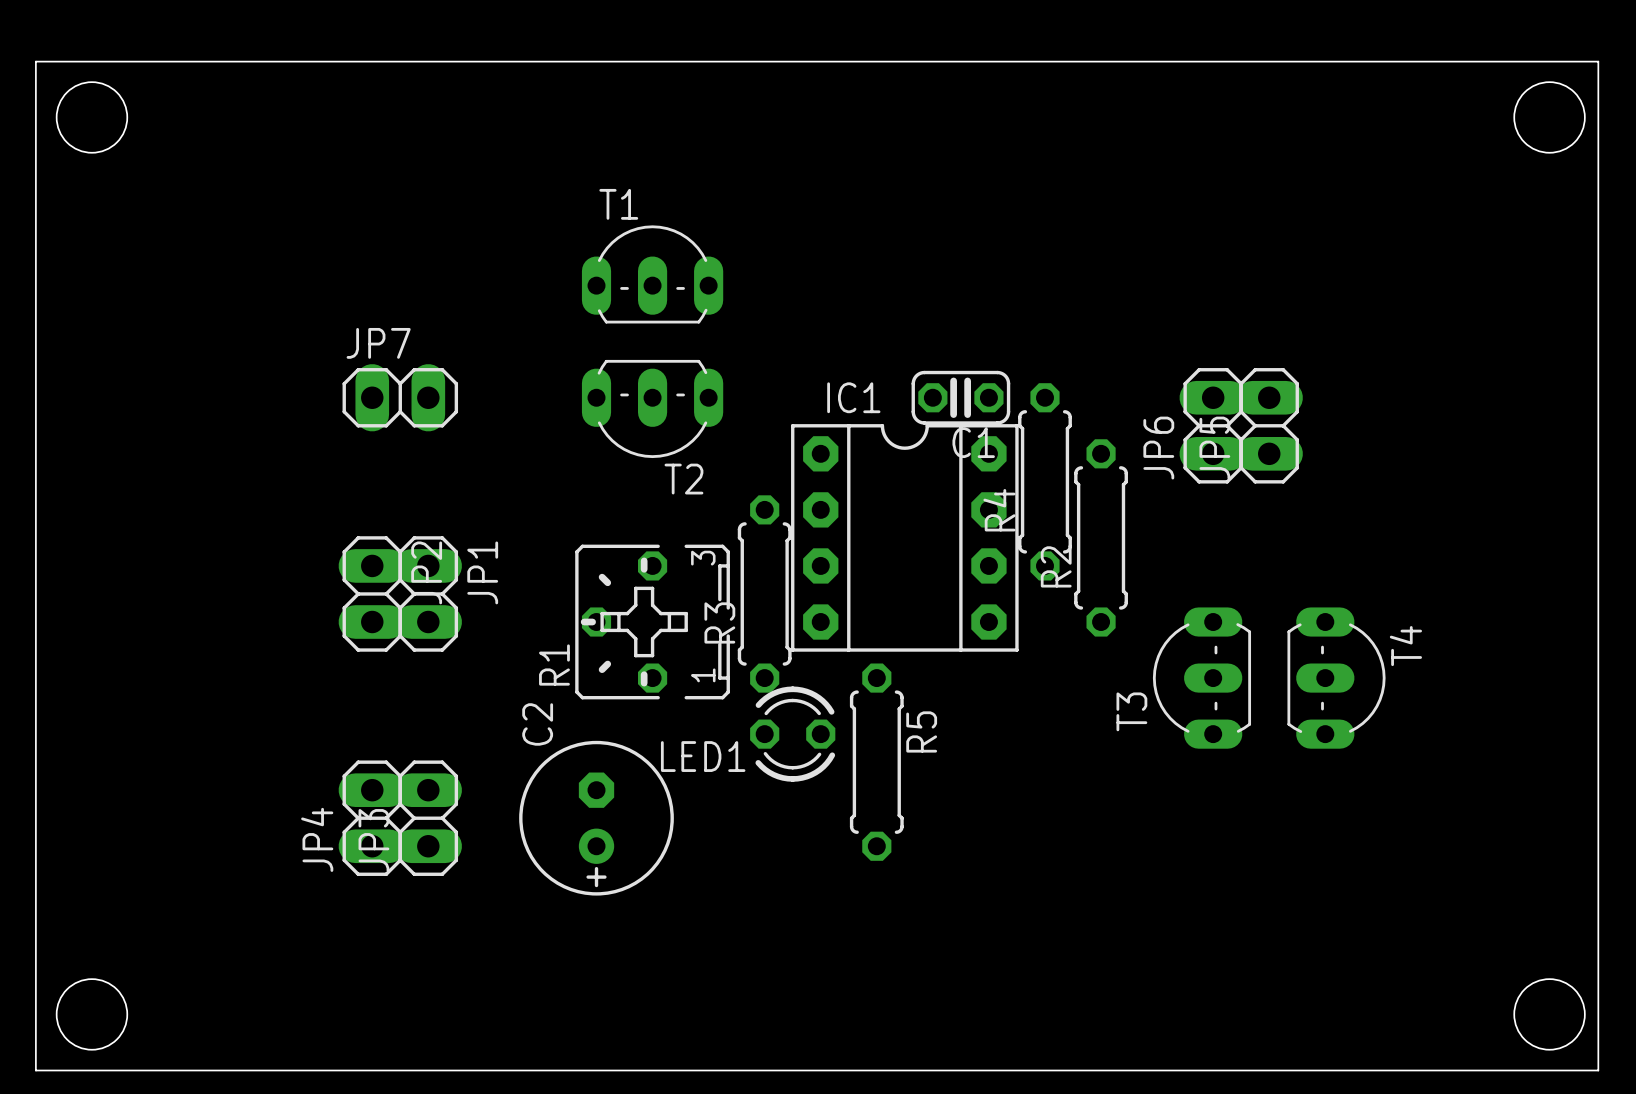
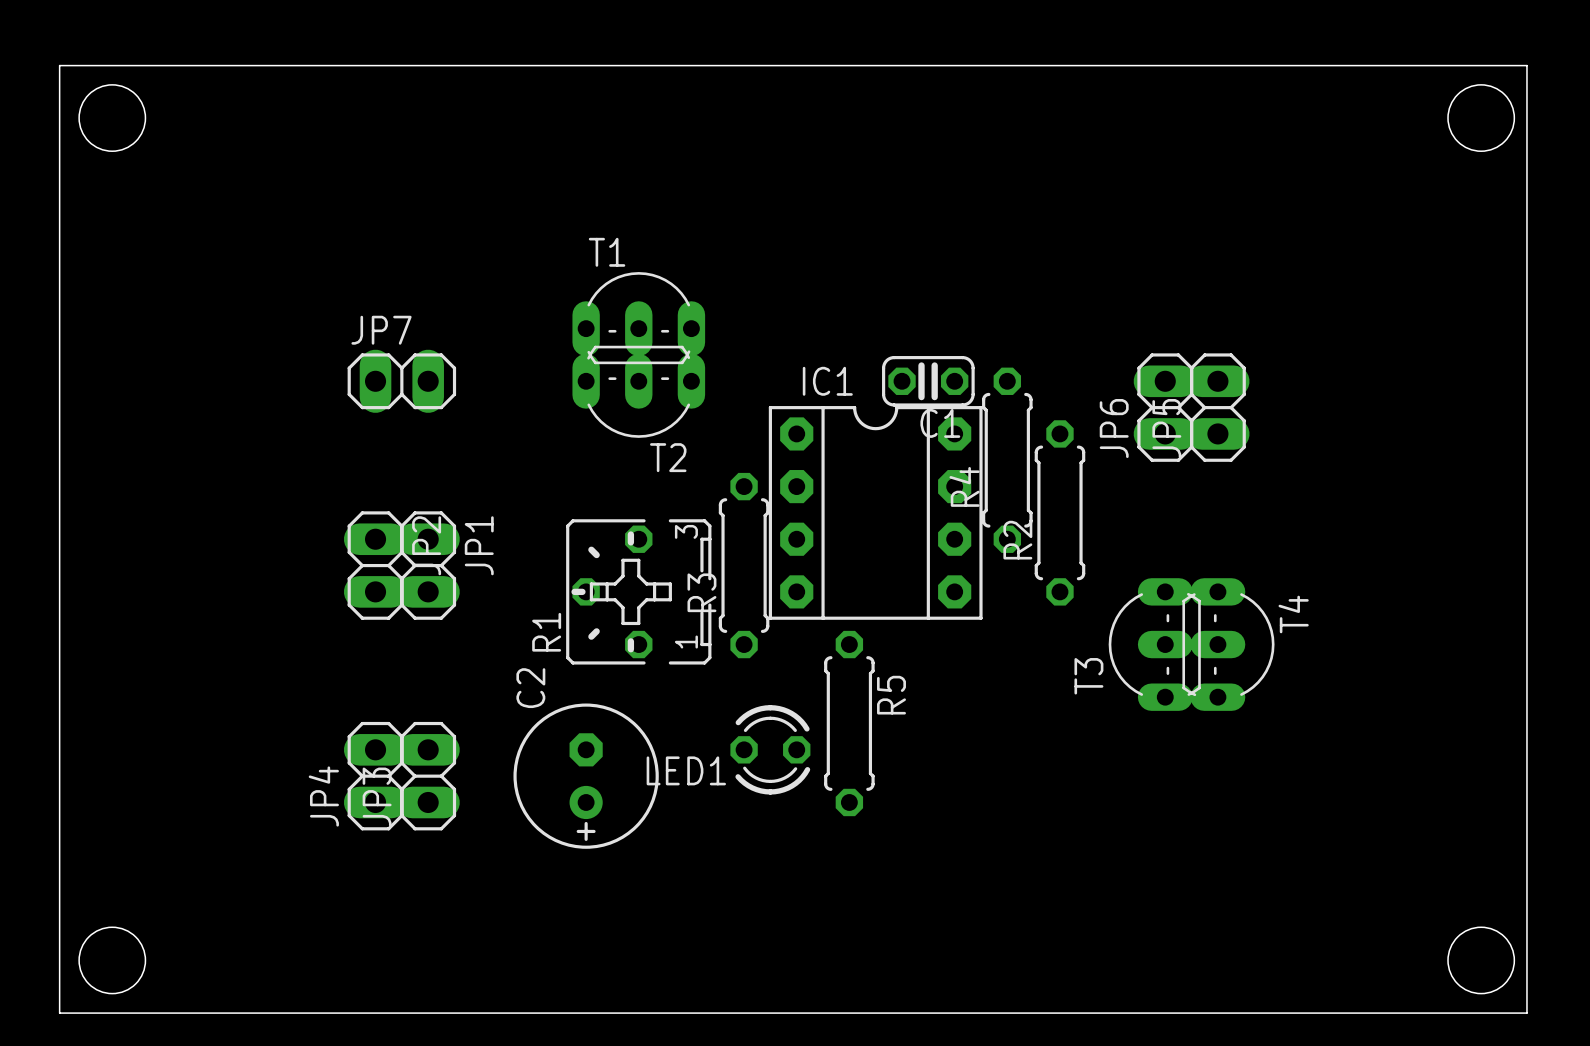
T1 position: (652, 274) -> (638, 318)
T4 position: (1336, 678) -> (1228, 644)
LED1 position: (792, 734) -> (770, 749)

